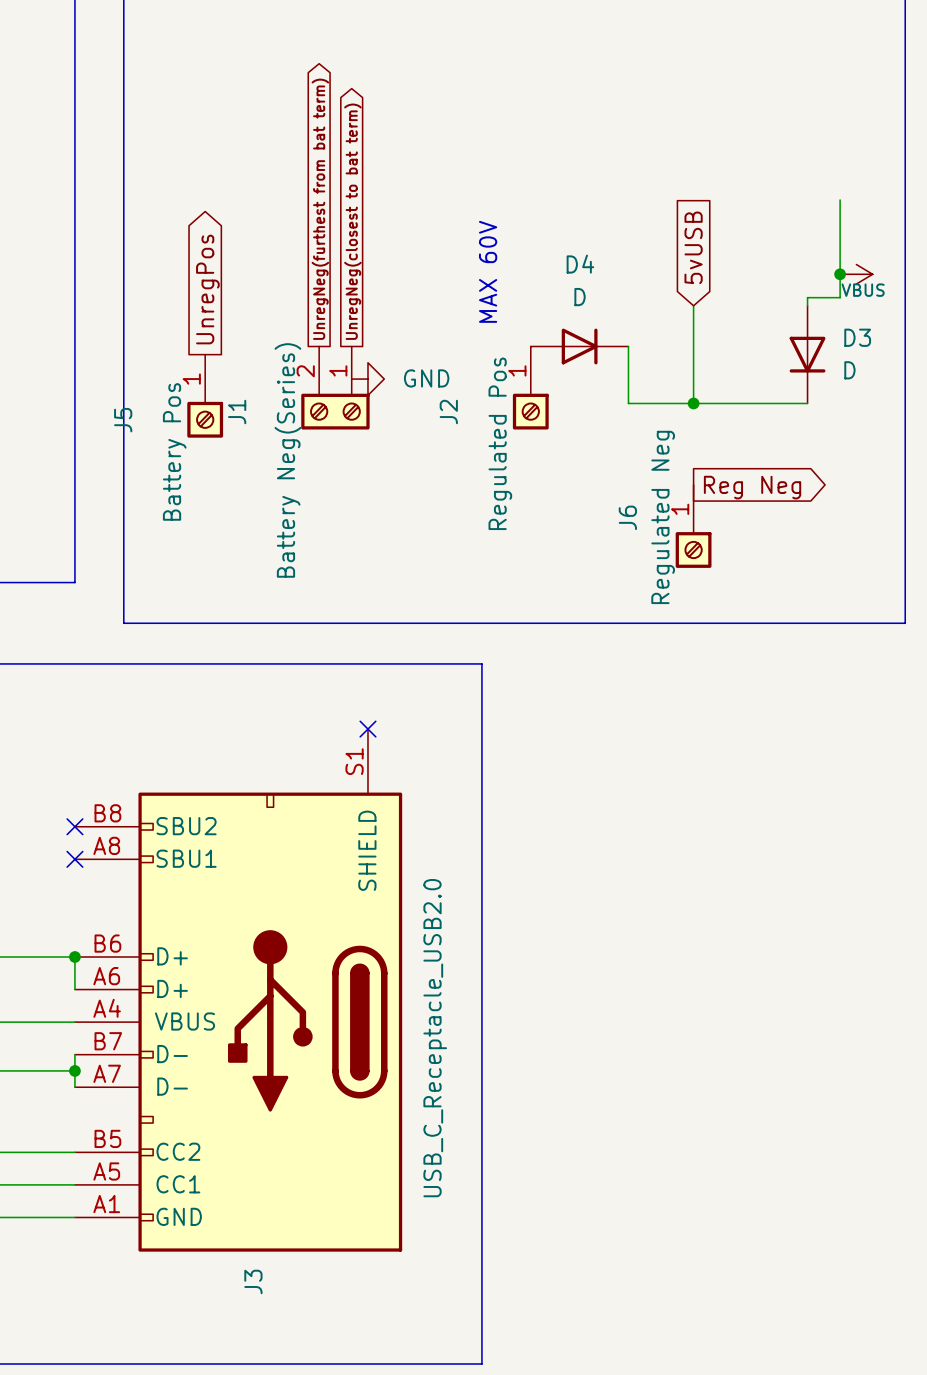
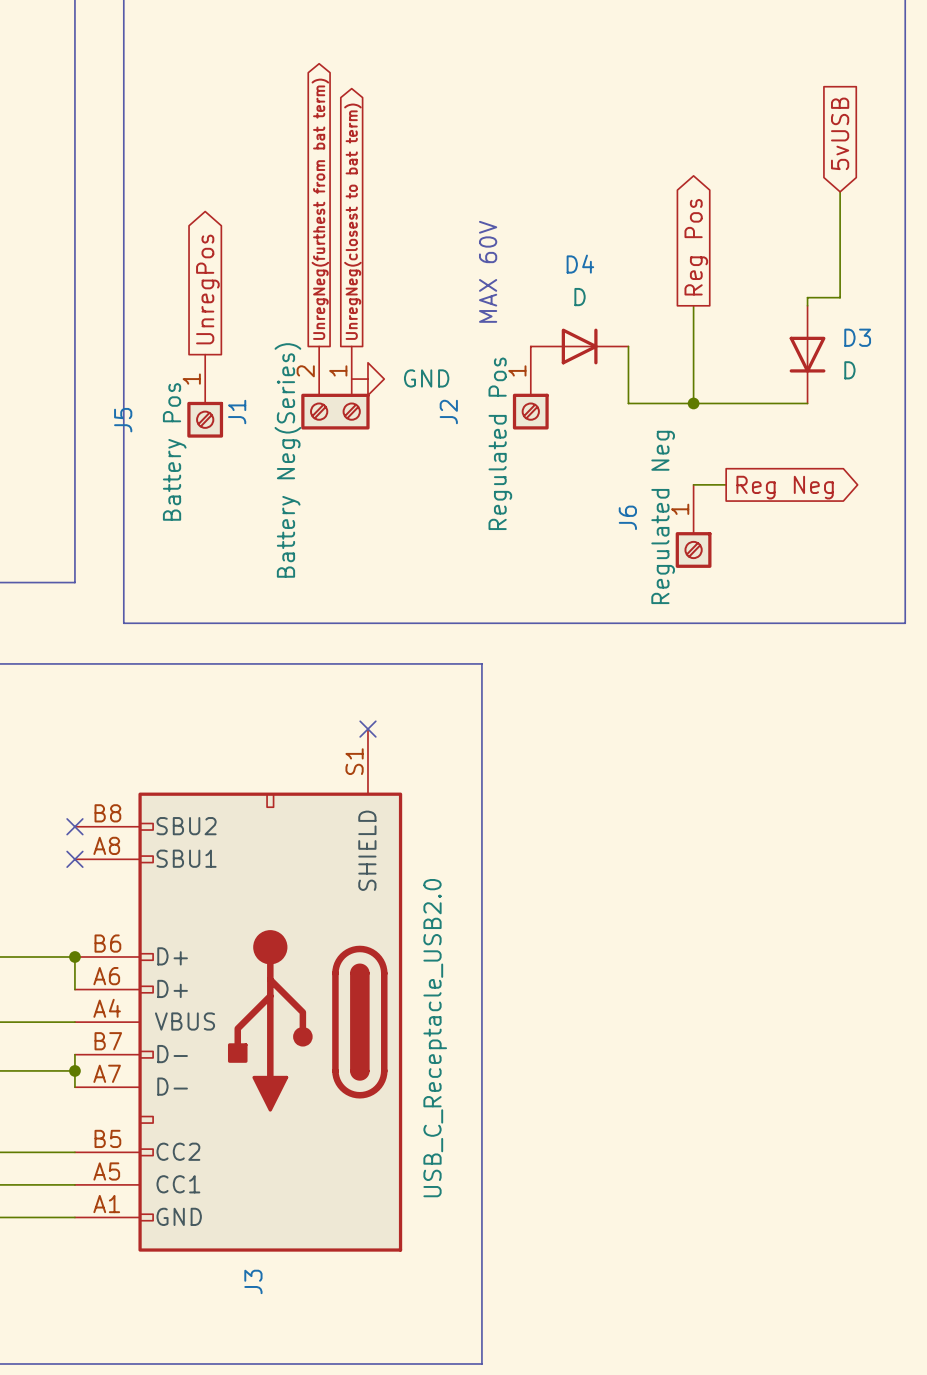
global label: none -> 5vUSB (840, 133)
wire: none -> (840, 191) (840, 199)
global label shape: input (693, 247) -> output (696, 247)
global label: 5vUSB (693, 247) -> Reg Pos (696, 247)
junction: (840, 274) -> none
power symbol: VBUS (856, 274) -> none
wire: none -> (693, 484) (726, 484)
global label position: Reg Neg (752, 487) -> Reg Neg (785, 487)

